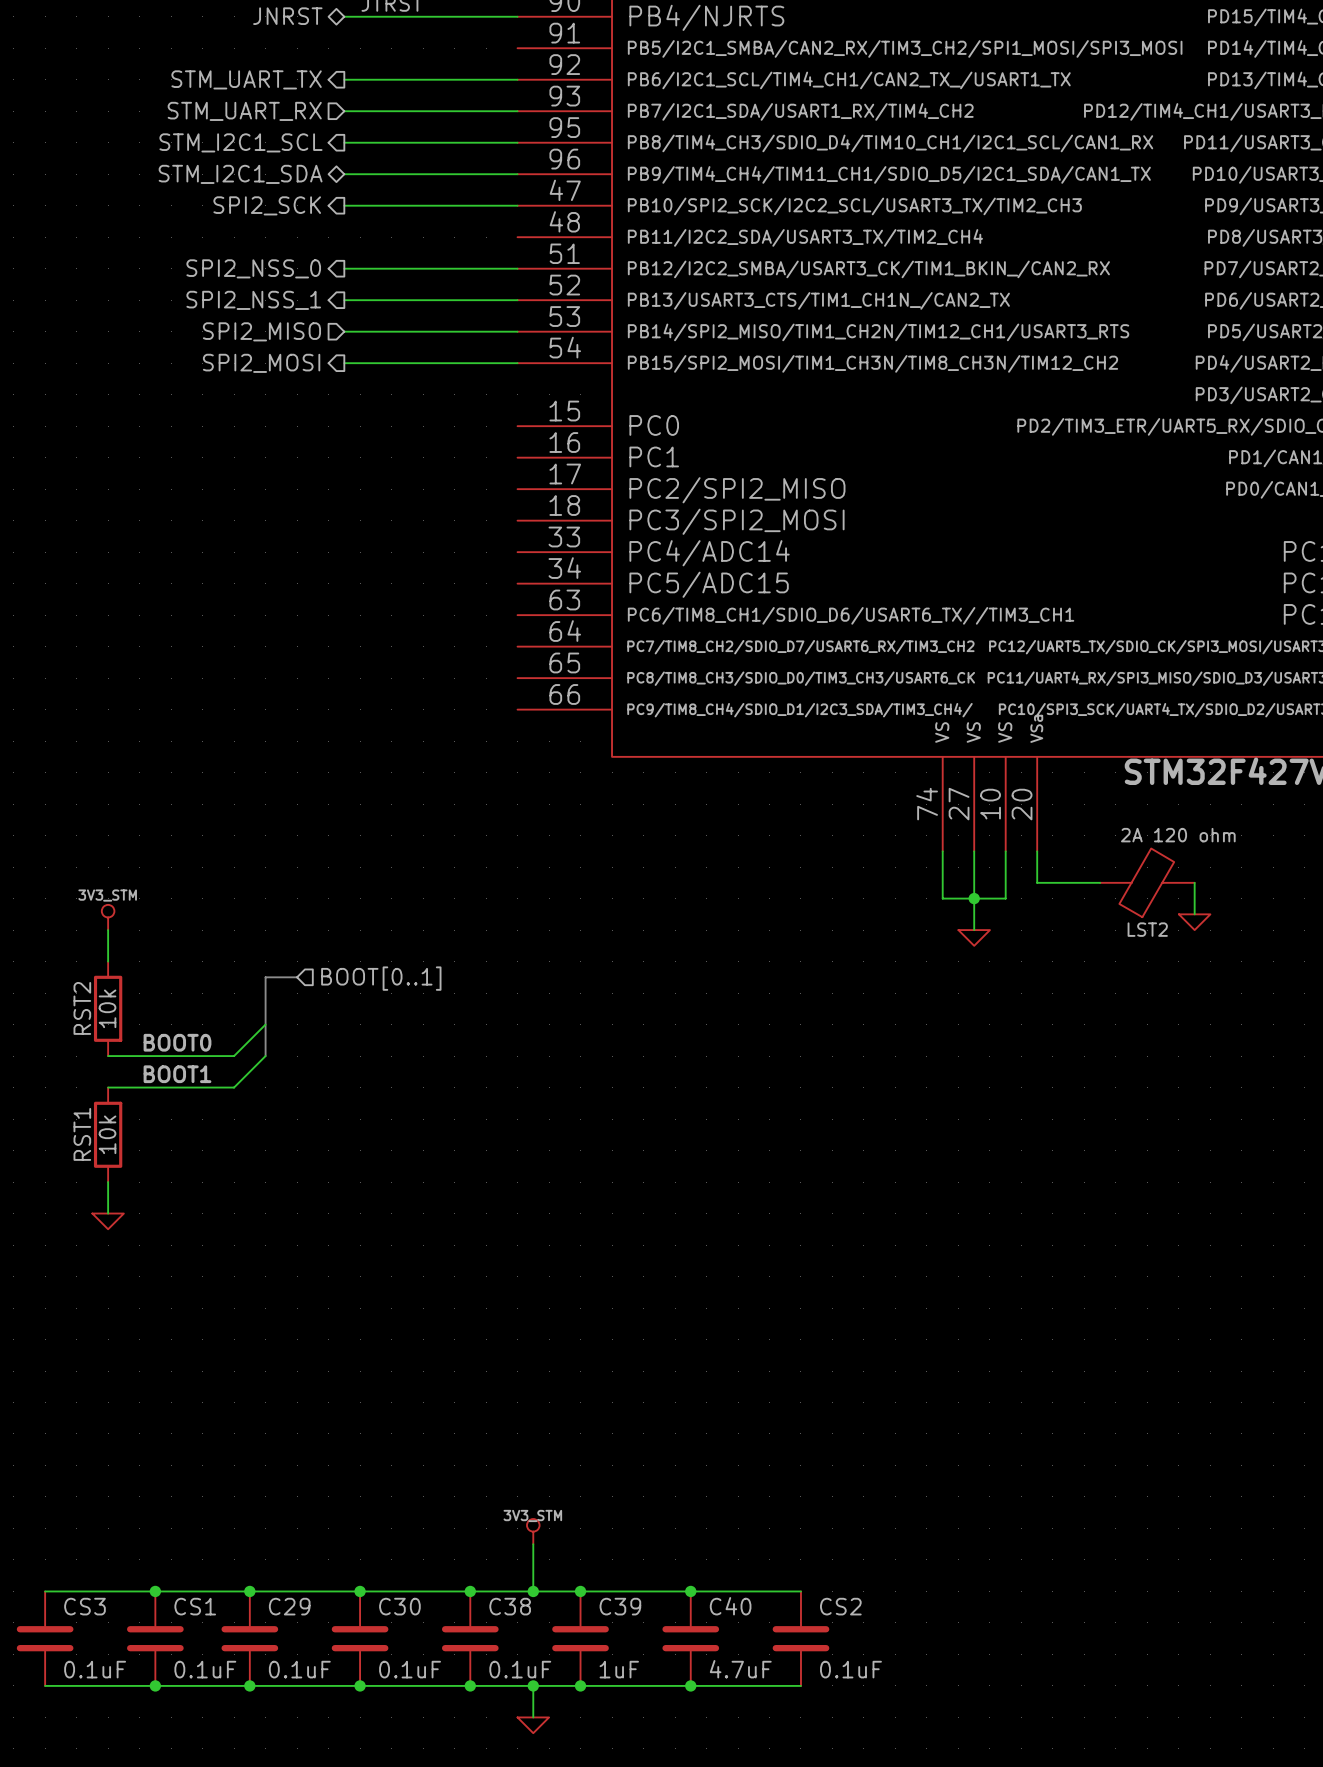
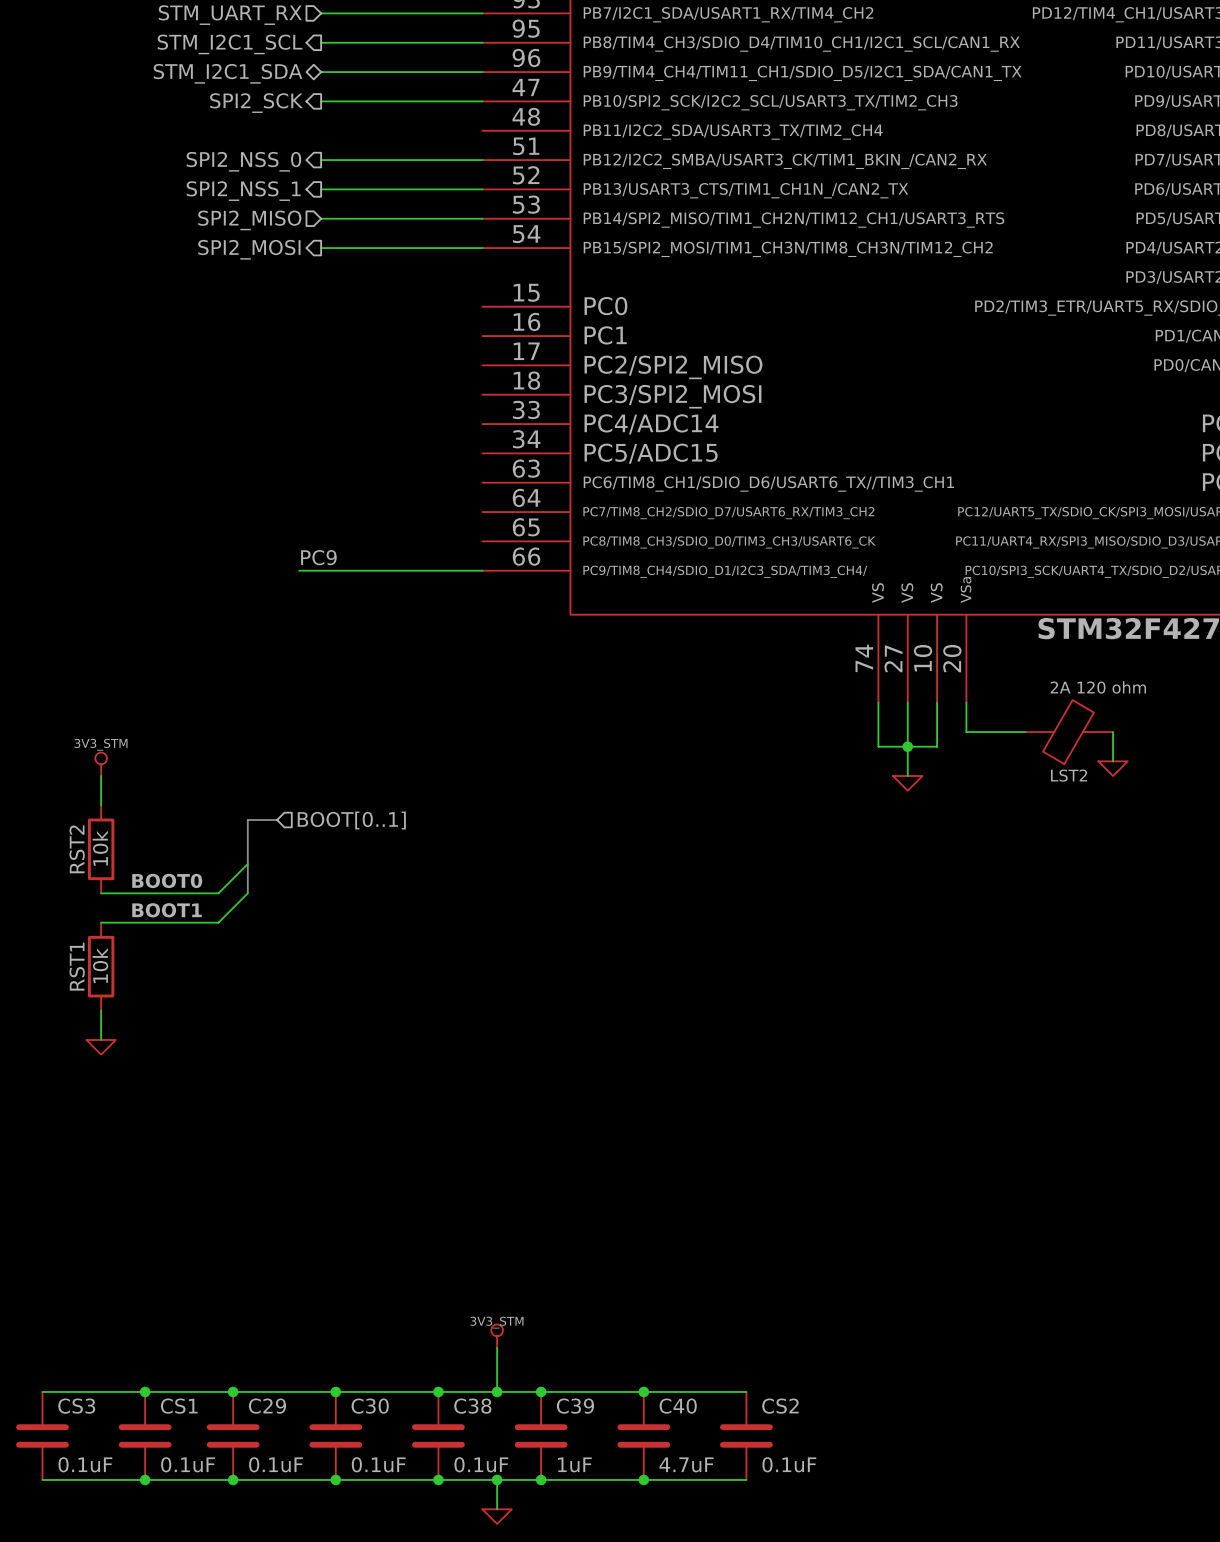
label: none -> PC9 (318, 557)
wire: none -> (299, 570) (482, 570)

